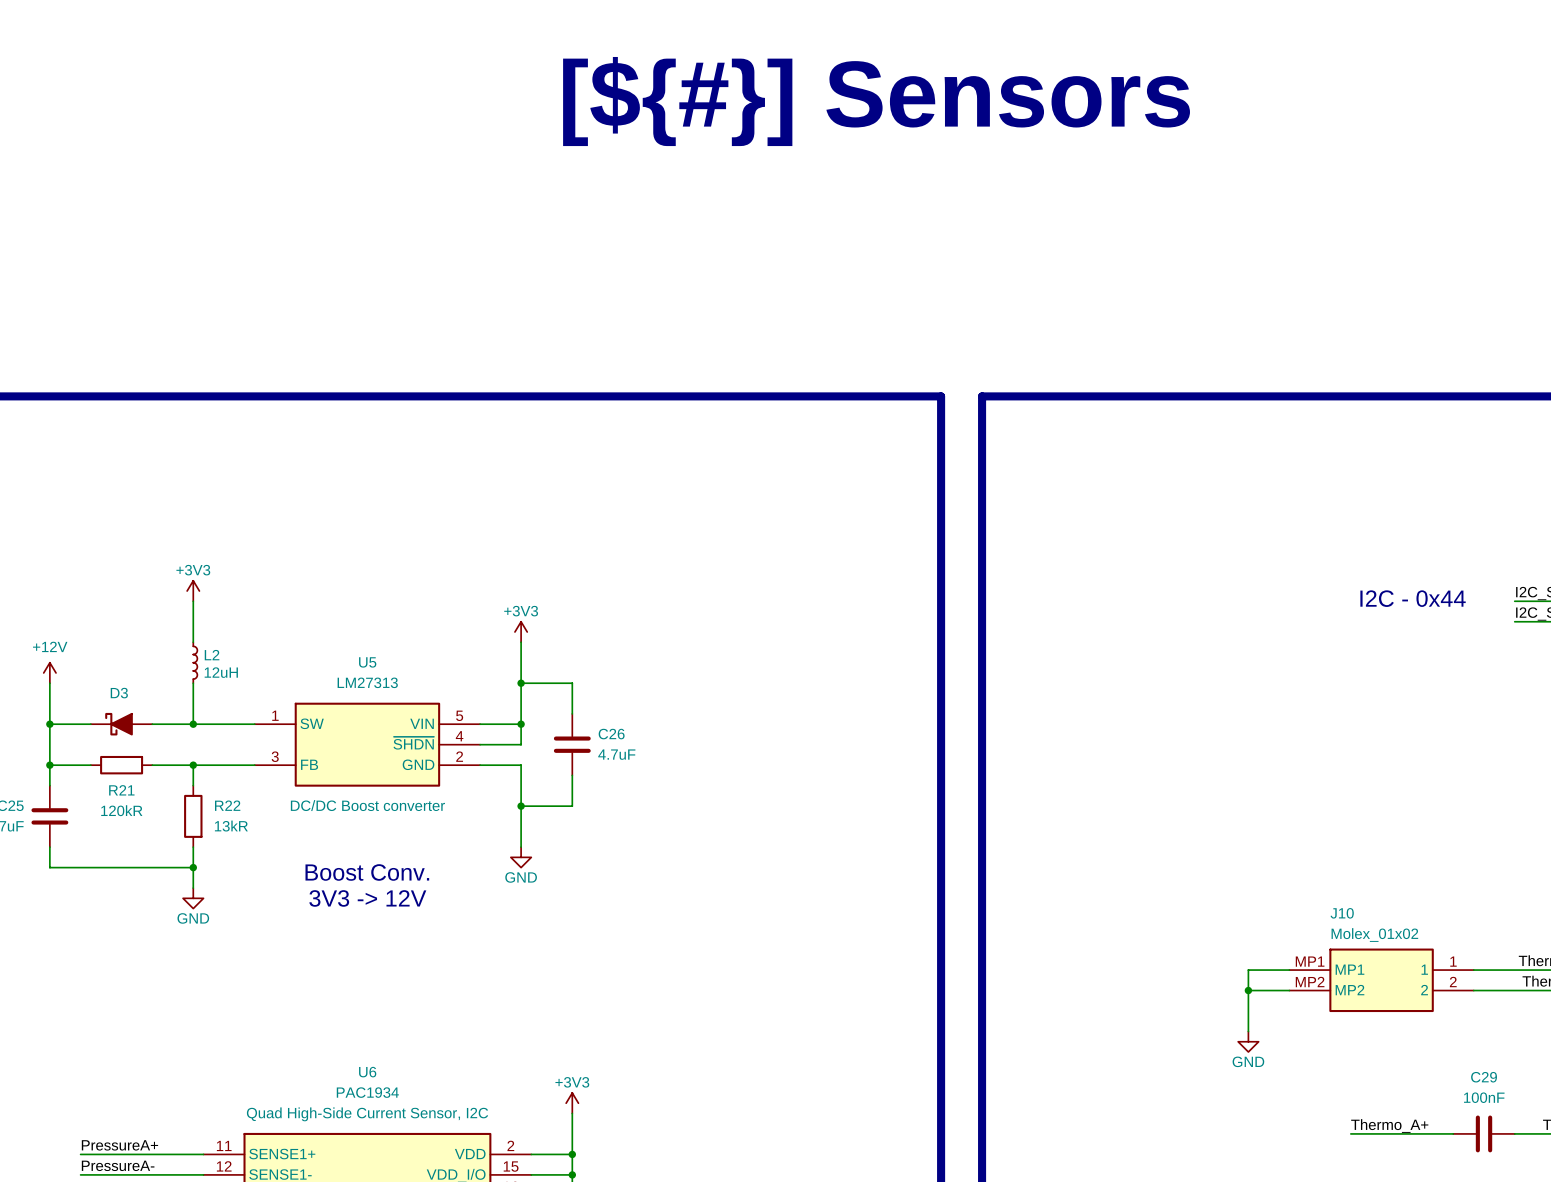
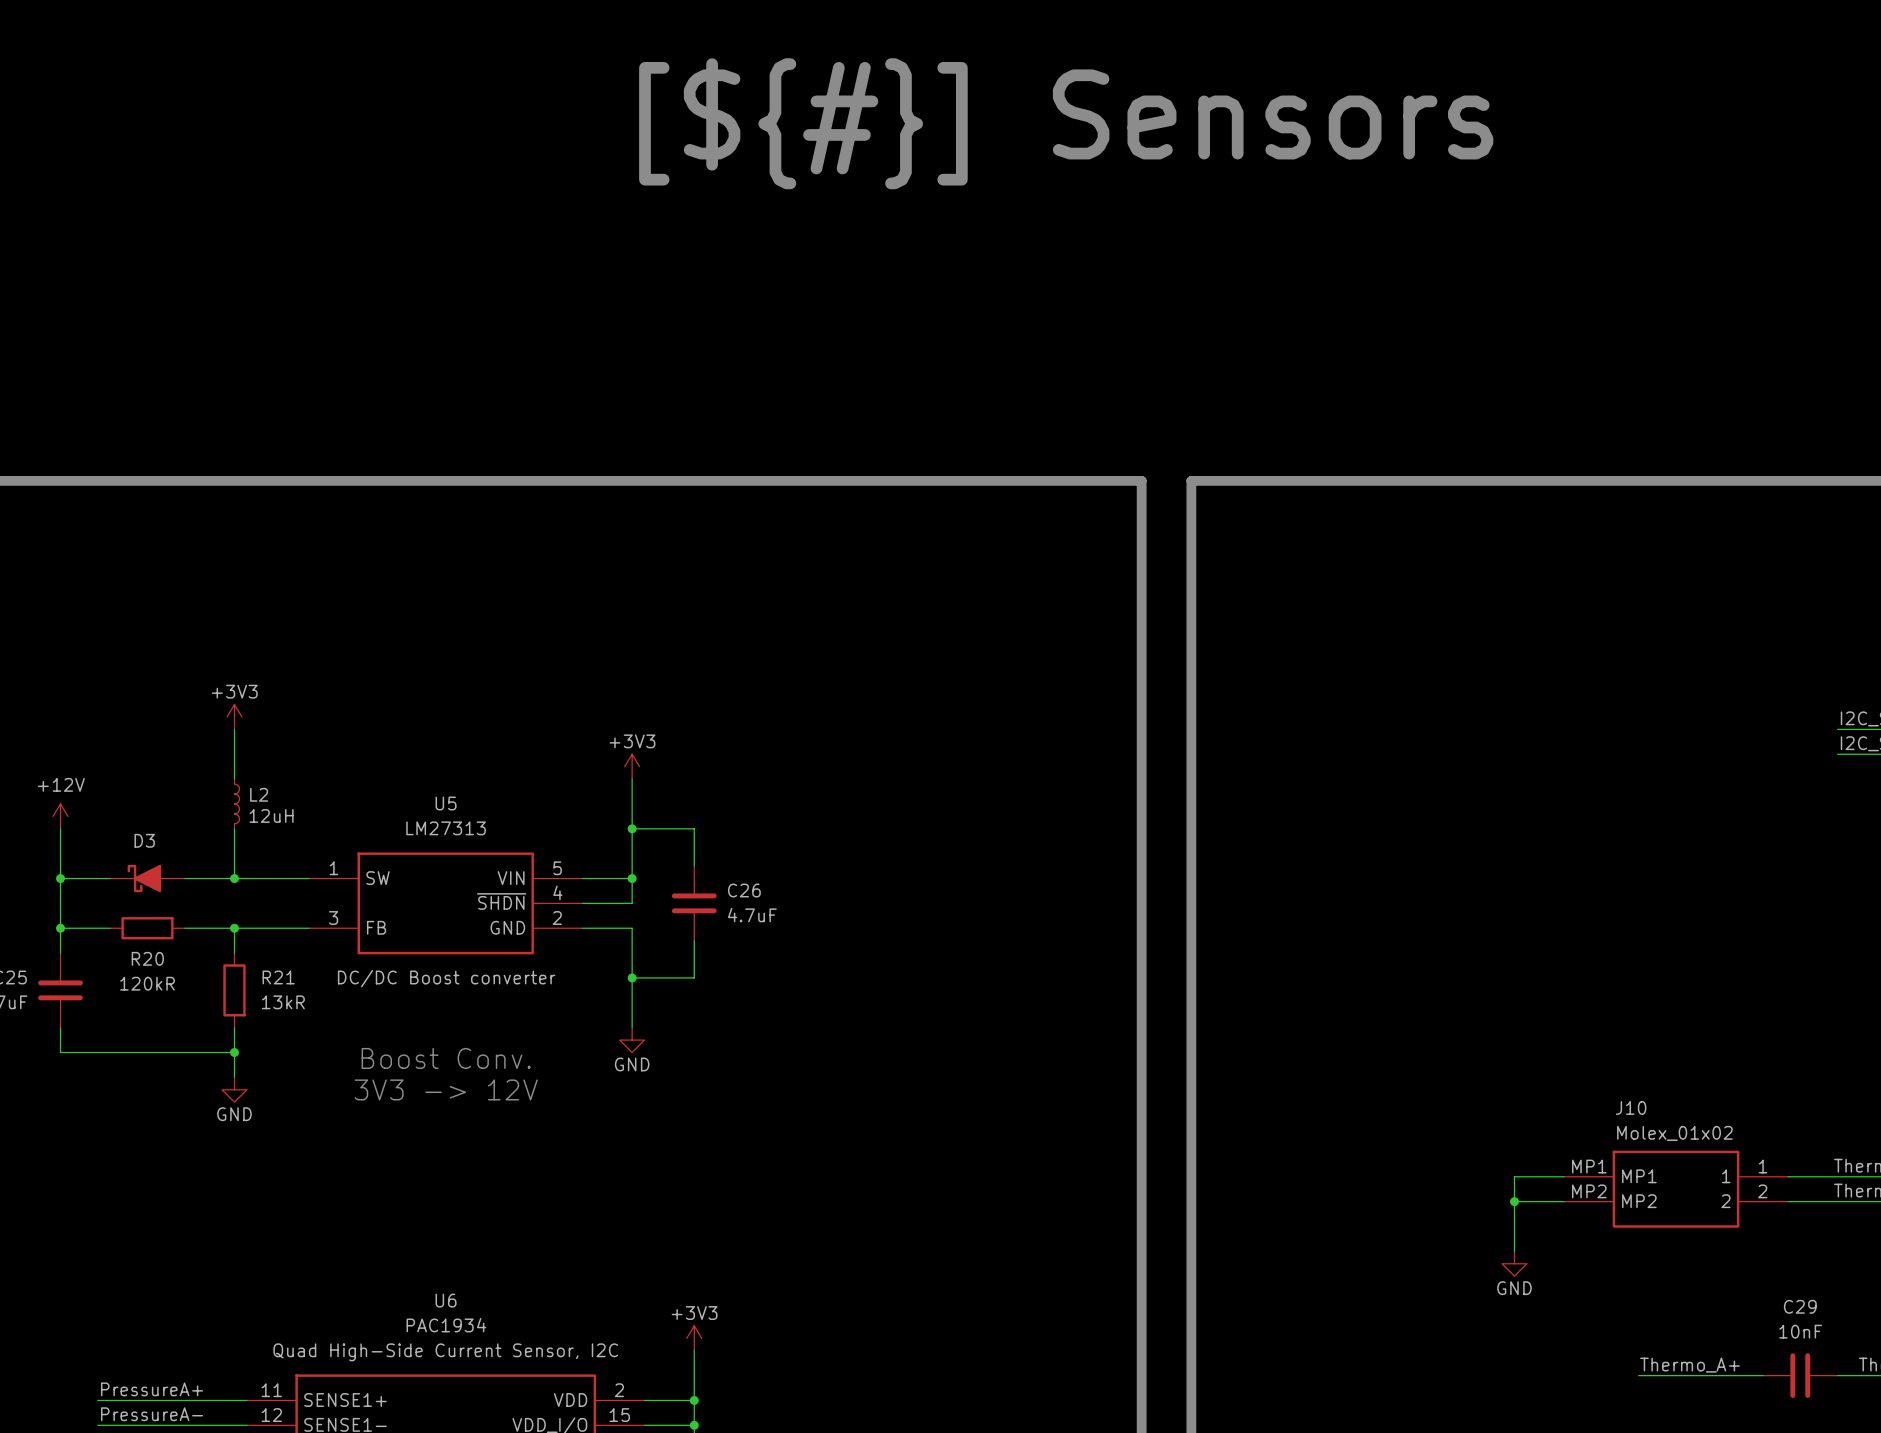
text: I2C - 0x44 (1413, 598) -> none
R21 name: R21 (121, 790) -> R20 (147, 958)
R22 name: R22 (227, 805) -> R21 (278, 977)
C29 value: 100nF (1484, 1097) -> 10nF (1800, 1331)

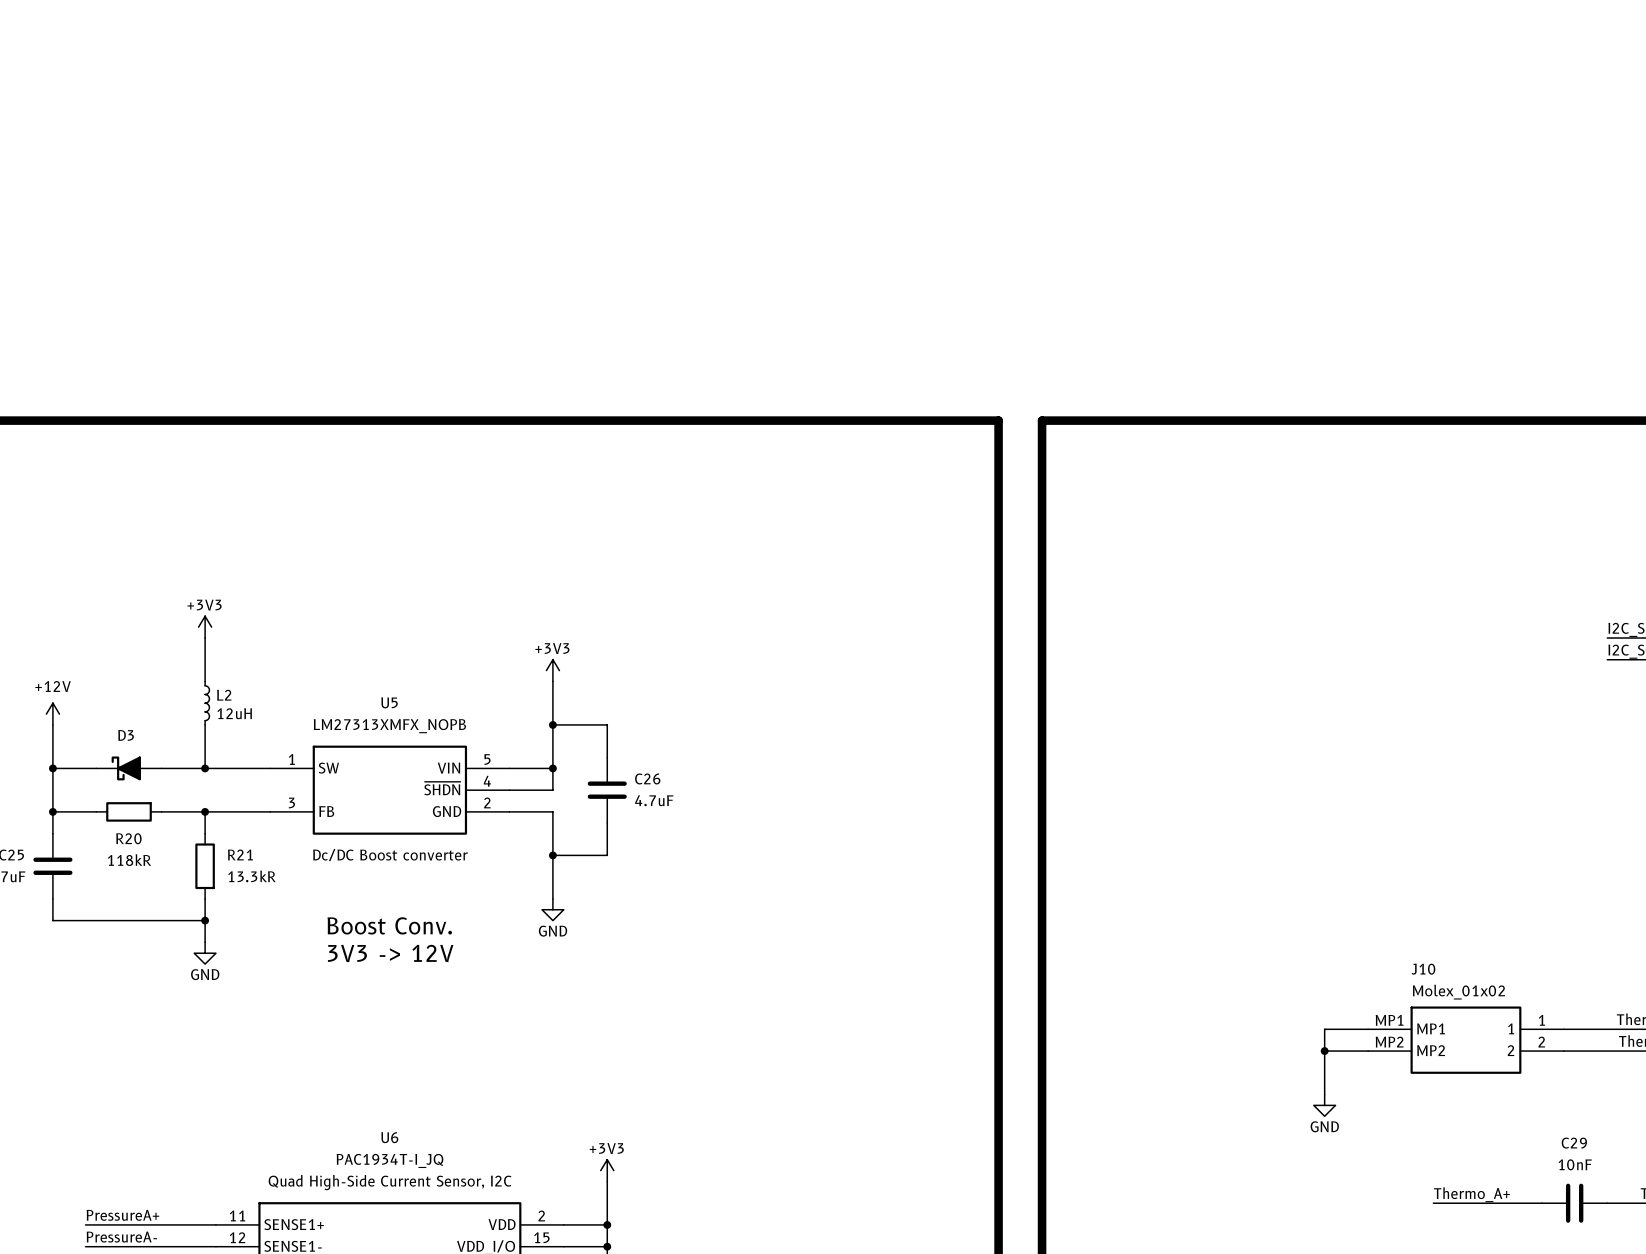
text: [${#}] Sensors (1066, 123) -> none
U5 value: LM27313 (446, 828) -> LM27313XMFX_NOPB (389, 726)
U5 text: DC/DC Boost converter (446, 978) -> Dc/DC Boost converter (390, 855)
R20 value: 120kR (147, 983) -> 118kR (129, 860)
R21 value: 13kR (283, 1002) -> 13.3kR (251, 876)
U6 value: PAC1934 (446, 1325) -> PAC1934T-I_JQ (389, 1160)

